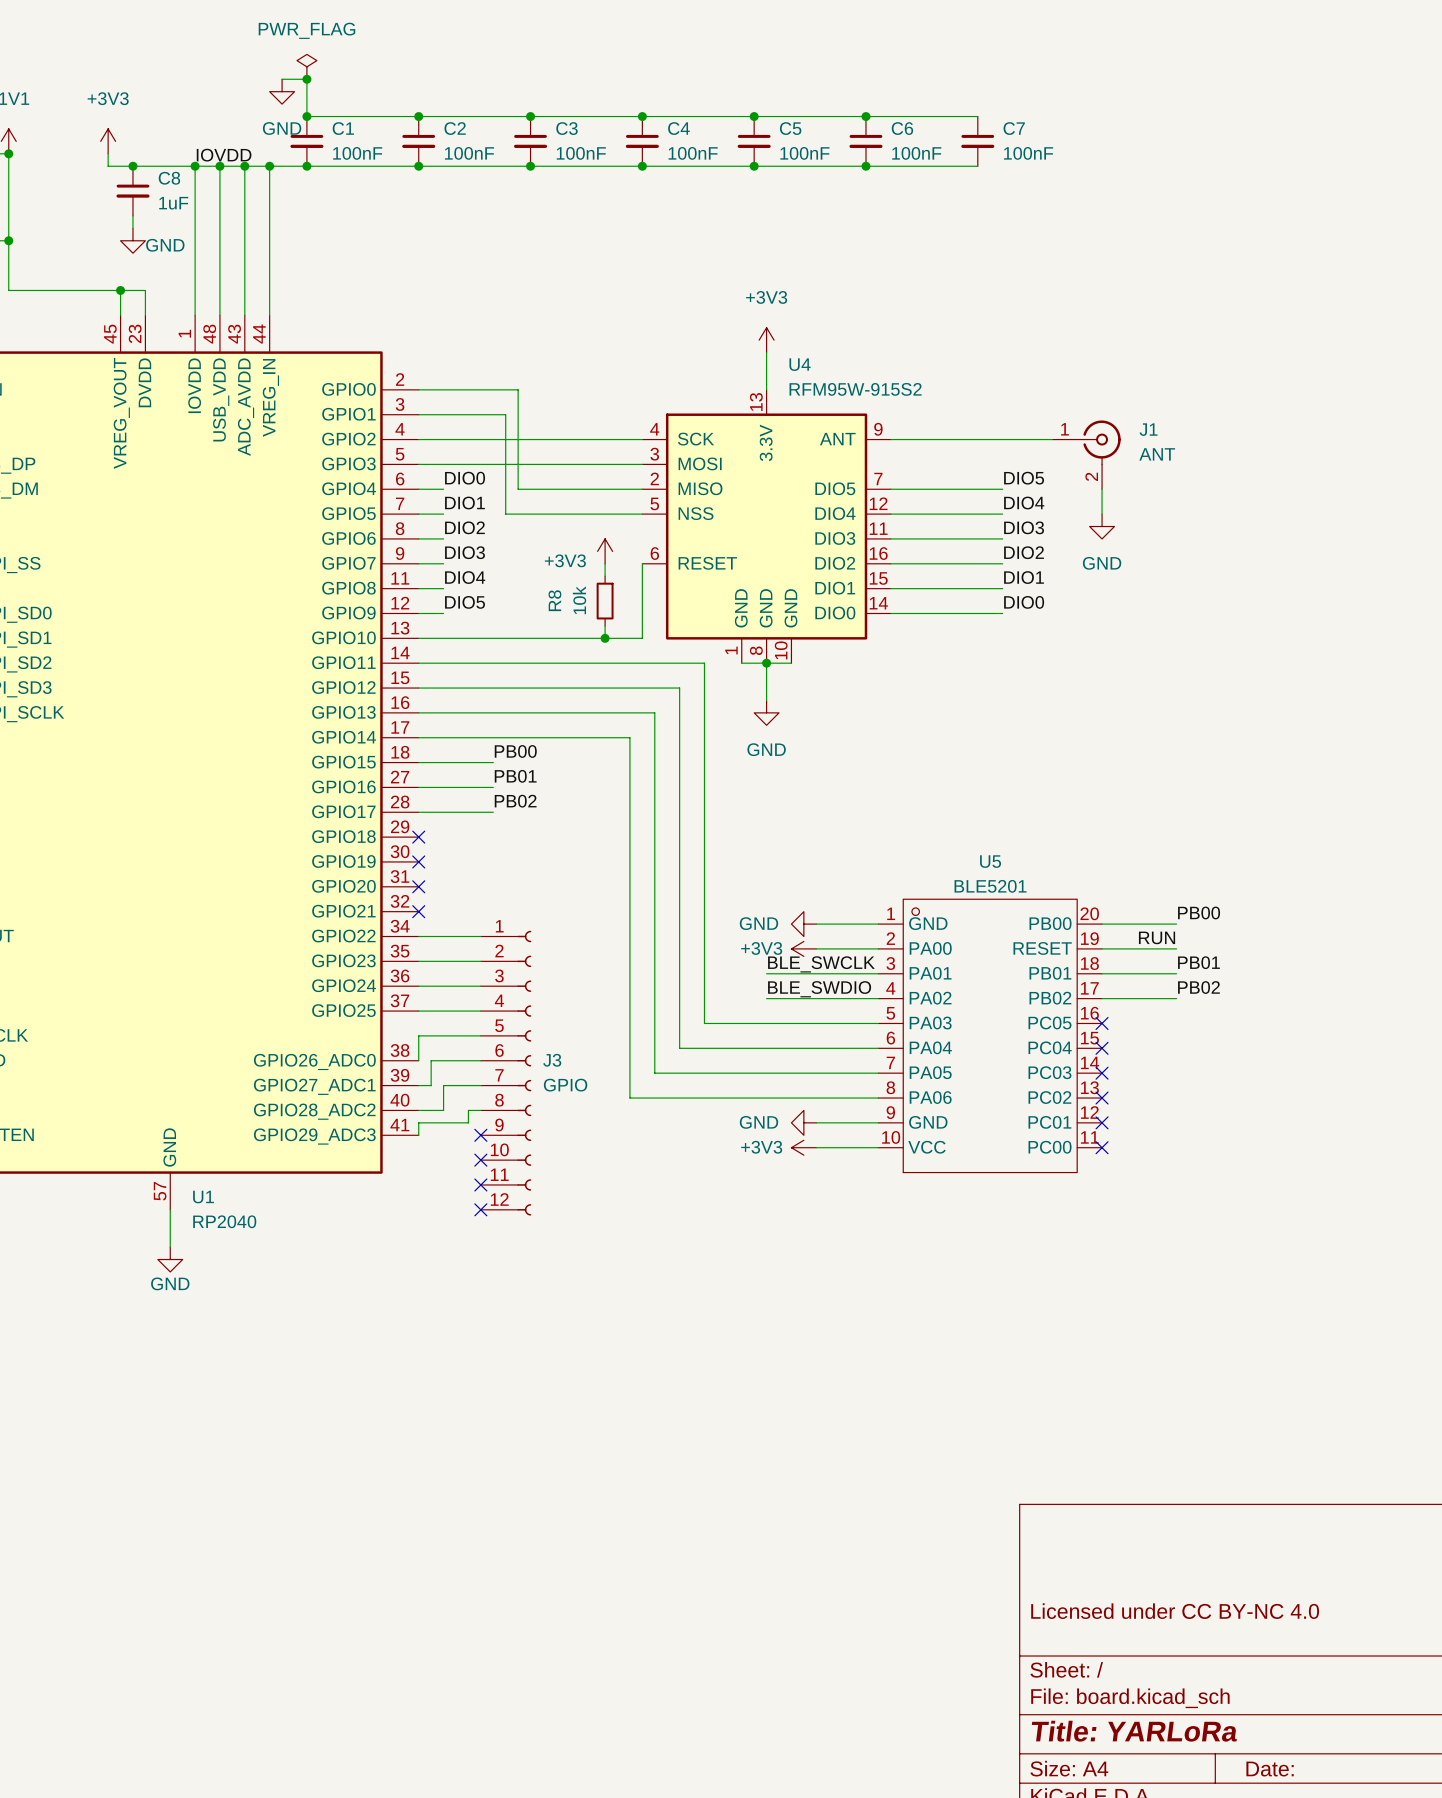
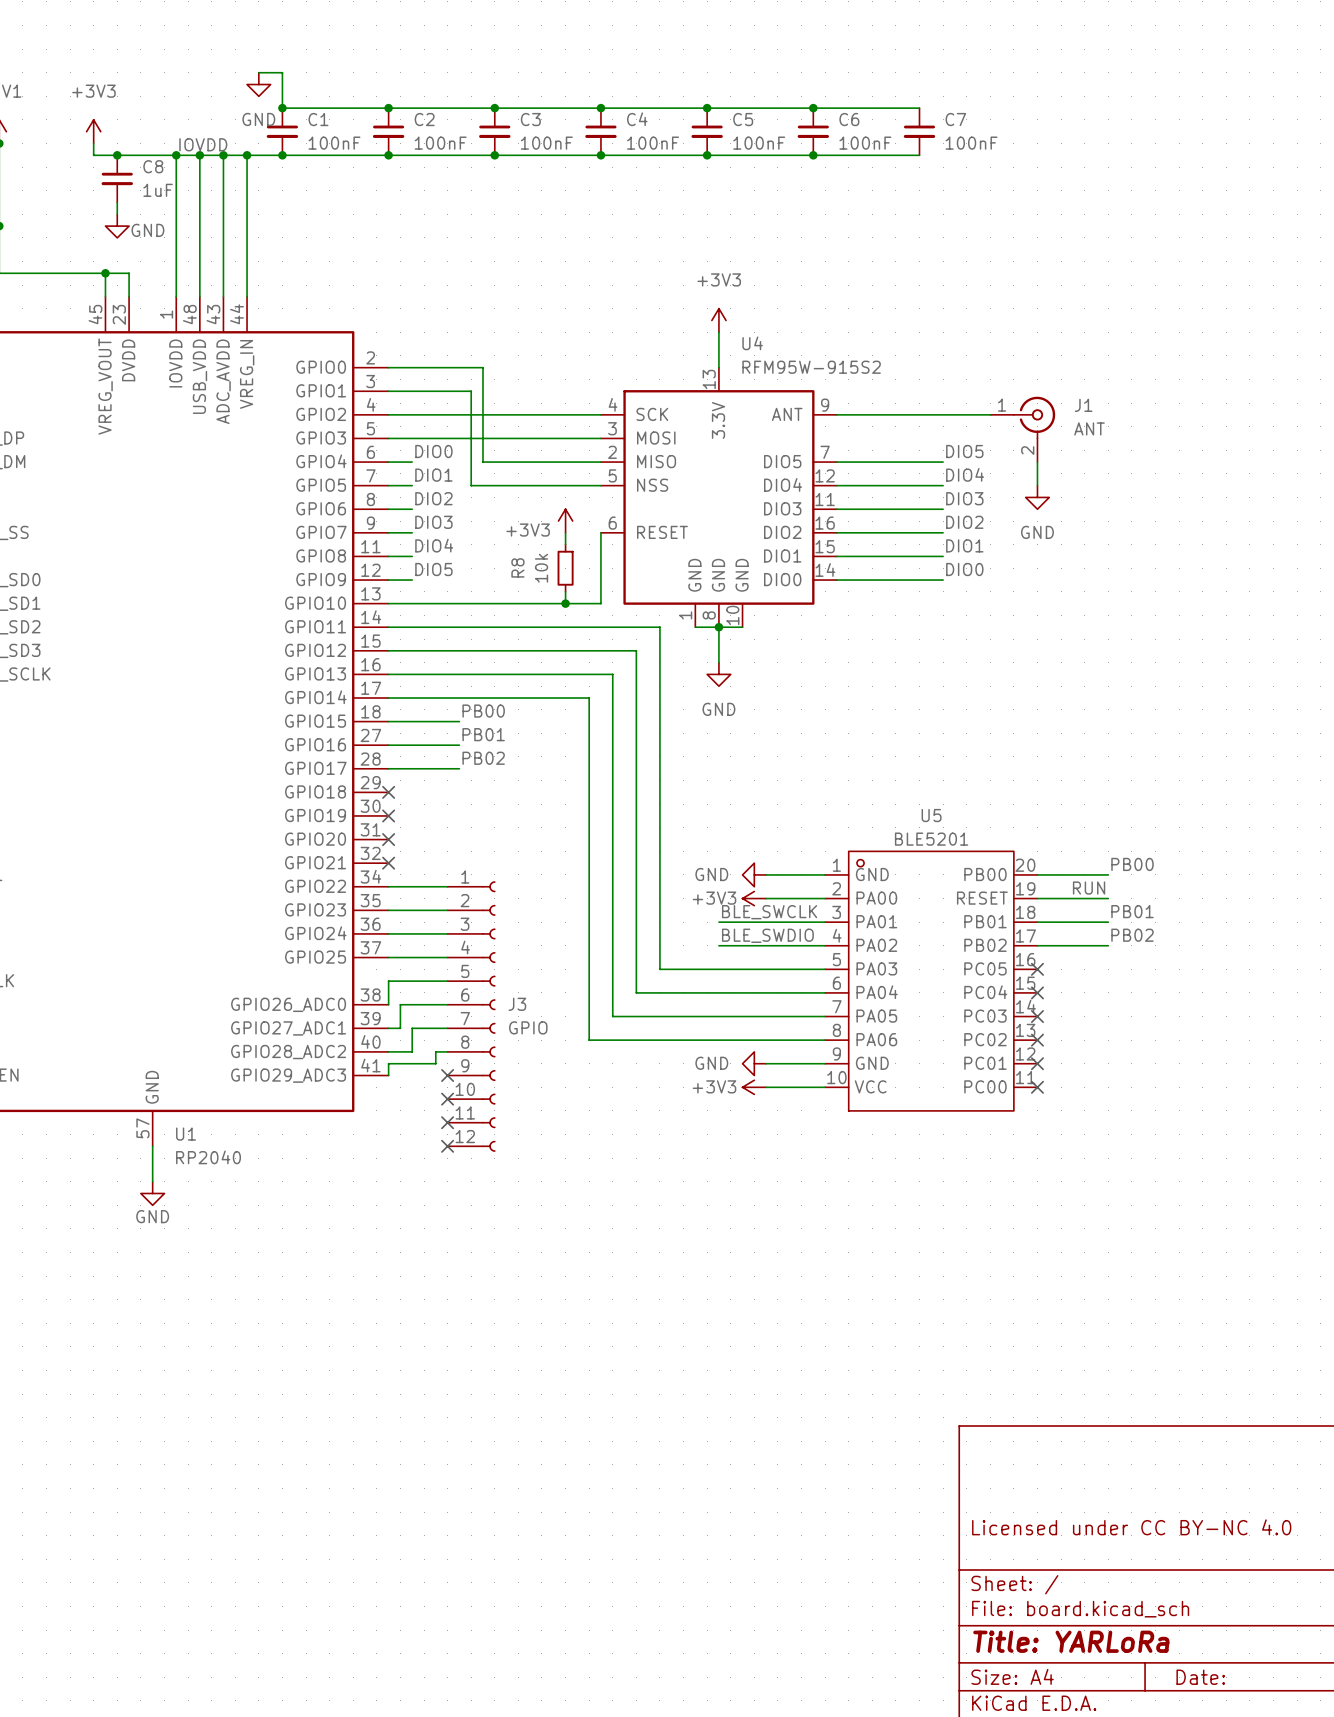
power symbol: PWR_FLAG (306, 66) -> none
junction: (306, 79) -> none

